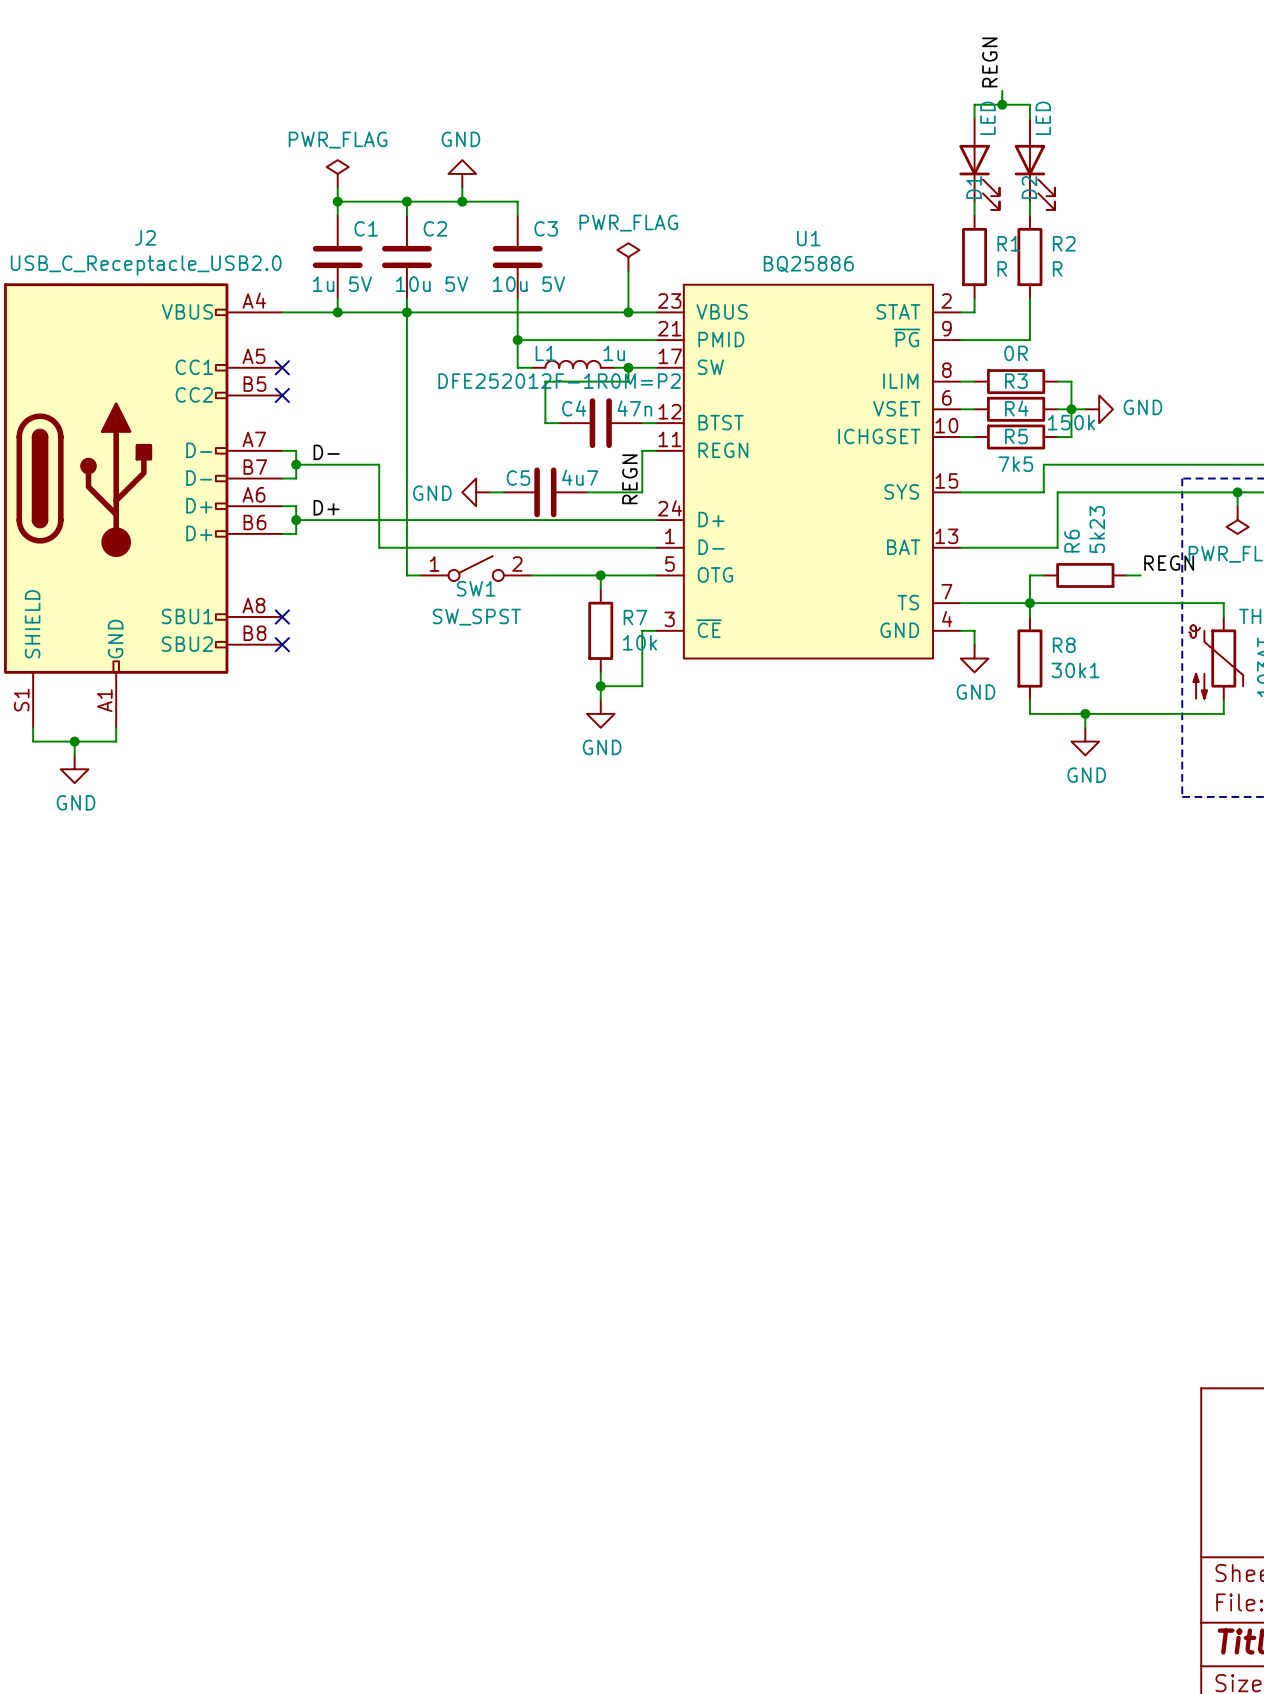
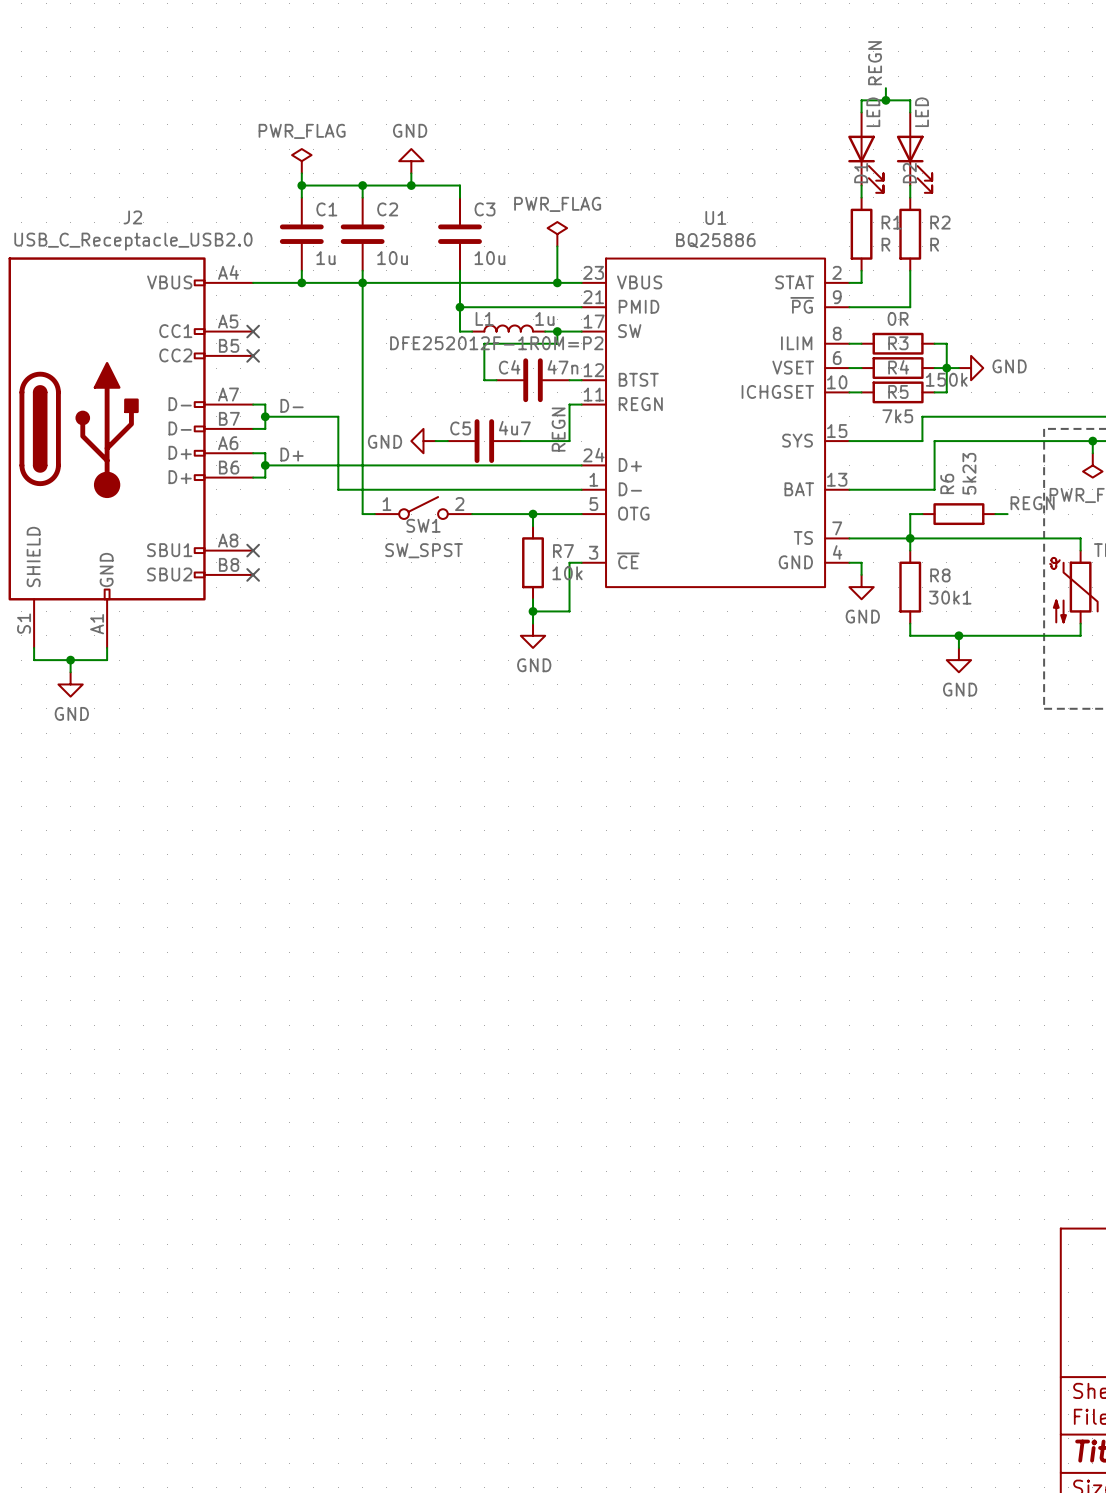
C1 value: 1u 5V (342, 284) -> 1u (325, 258)
C2 value: 10u 5V (432, 284) -> 10u (392, 258)
C3 value: 10u 5V (529, 284) -> 10u (489, 258)

